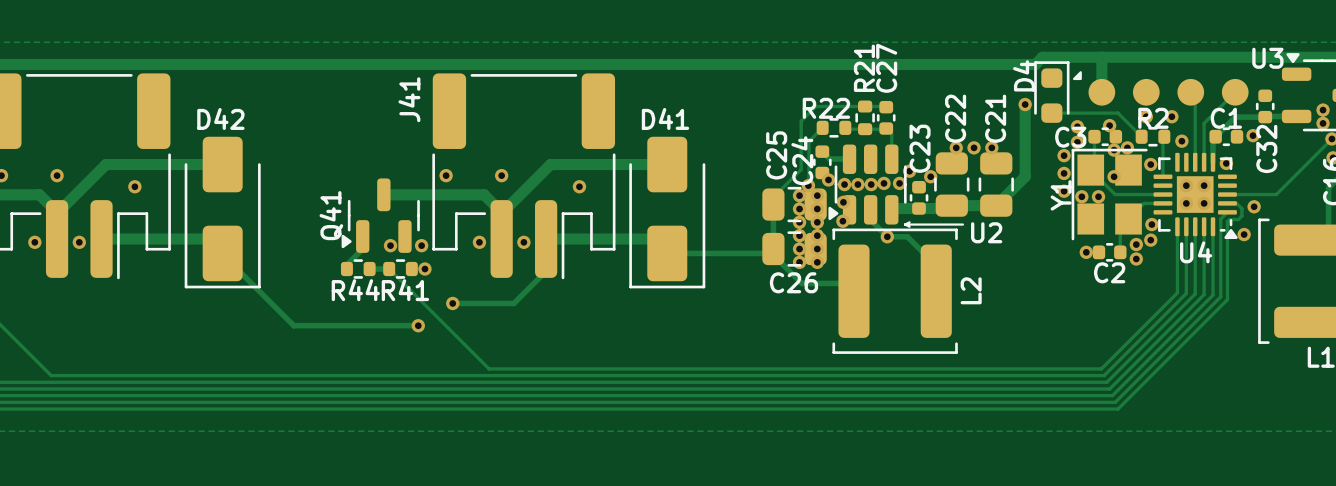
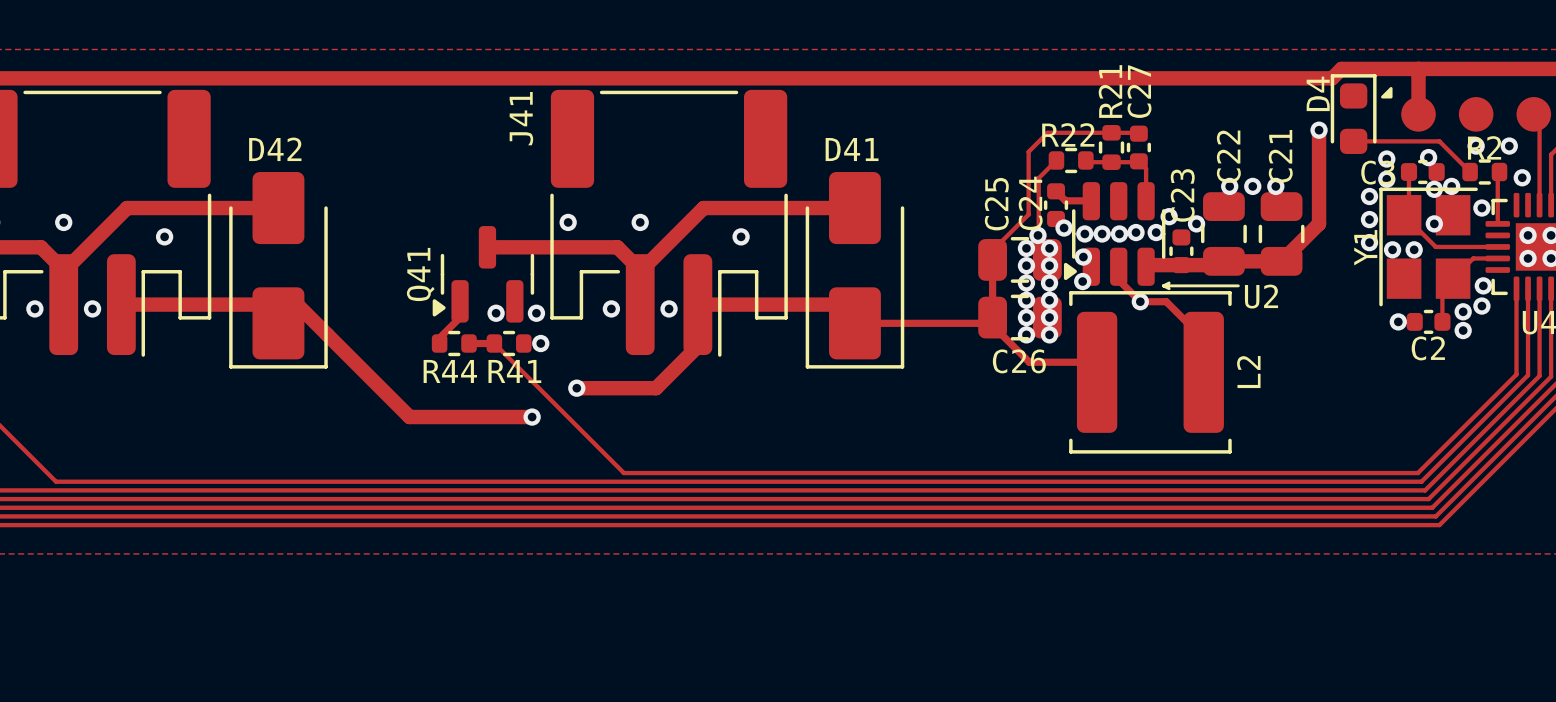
track: (208, 239) (293, 325) (323, 325) -> (259, 304) (297, 304) (409, 417)
track width: thin (546, 239) (546, 271) (513, 303) (452, 303) -> thick (697, 304) (697, 346) (656, 388) (576, 388)
track width: thin (323, 325) (418, 325) -> thick (409, 417) (532, 417)

